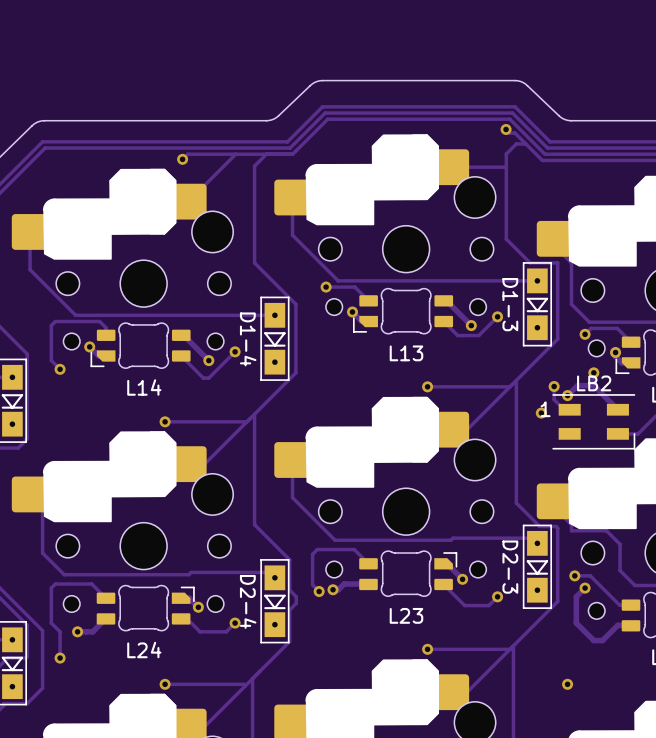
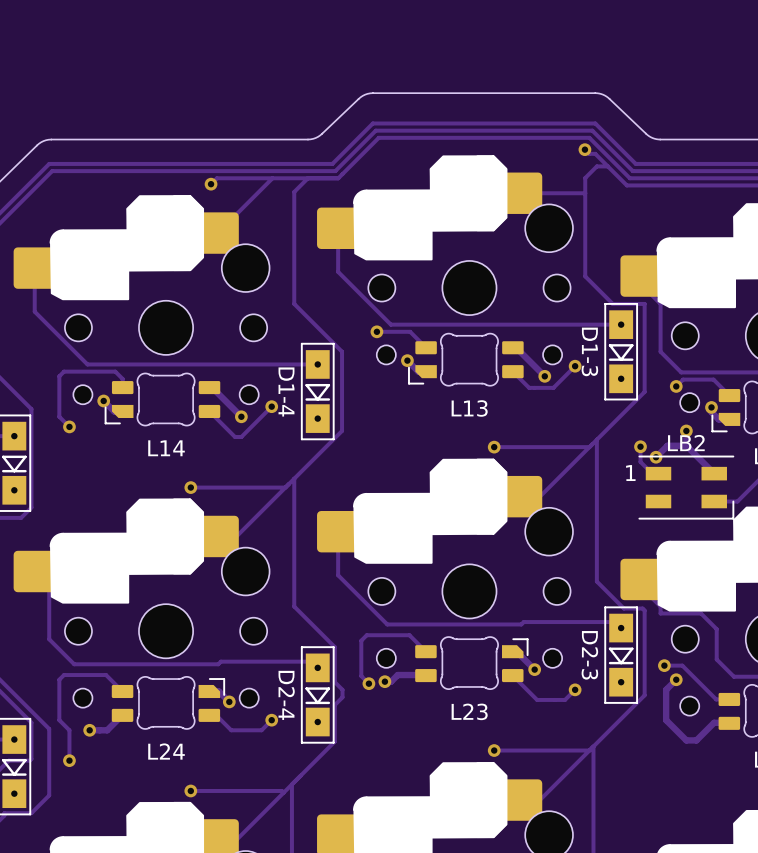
via: (541, 413) -> none
via: (567, 684) -> none

